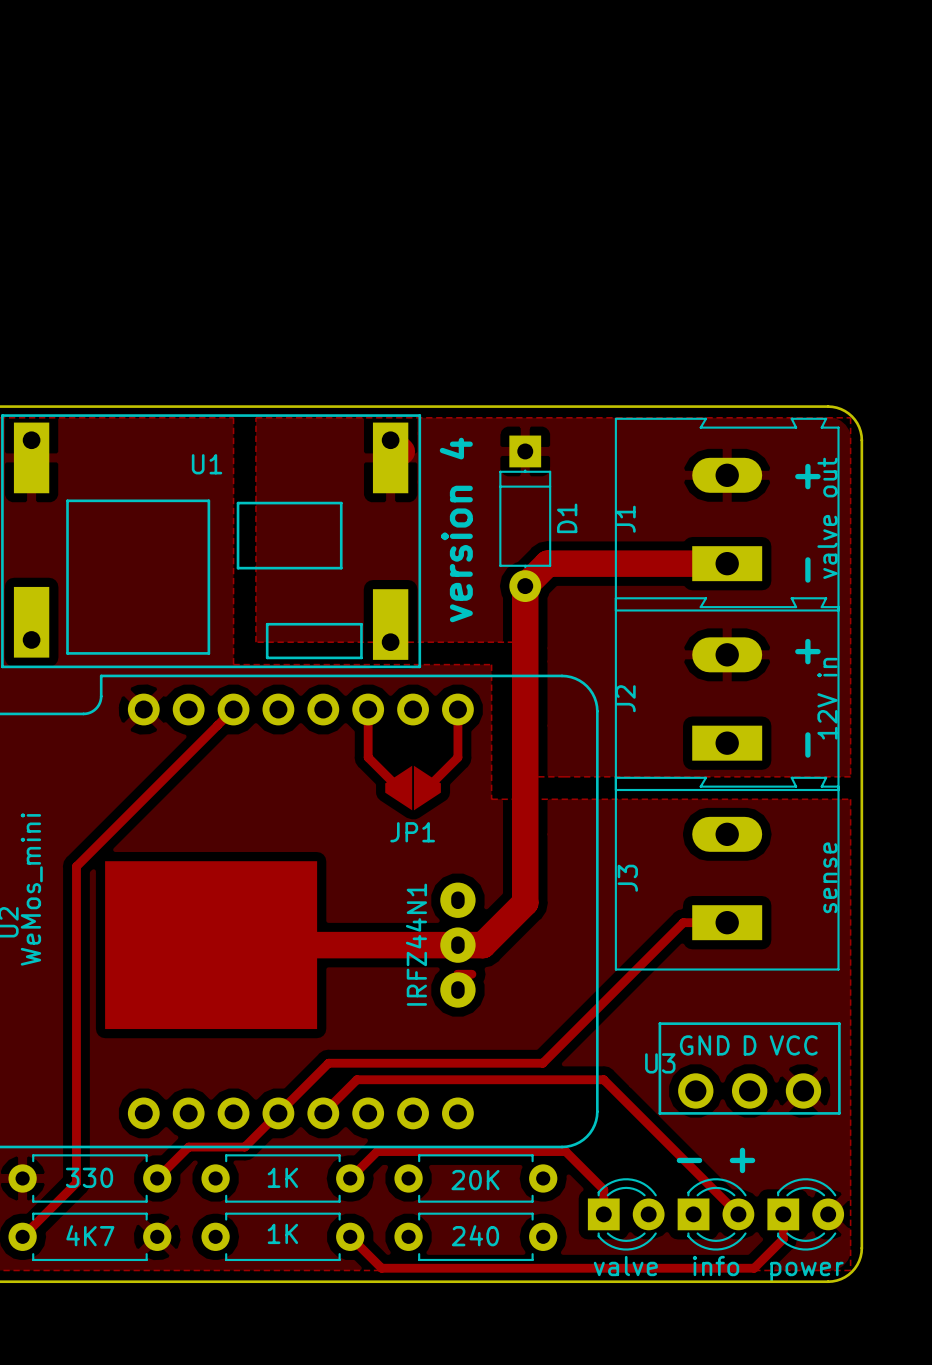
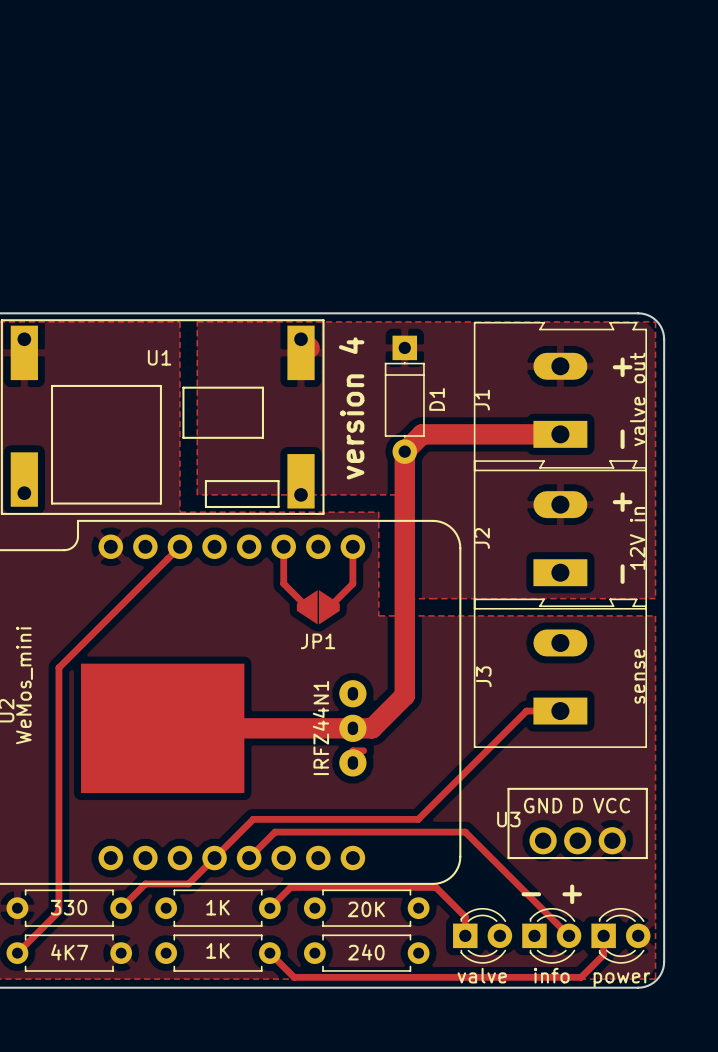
U3 footprint: [658, 1022, 841, 1115] -> [507, 787, 648, 860]

